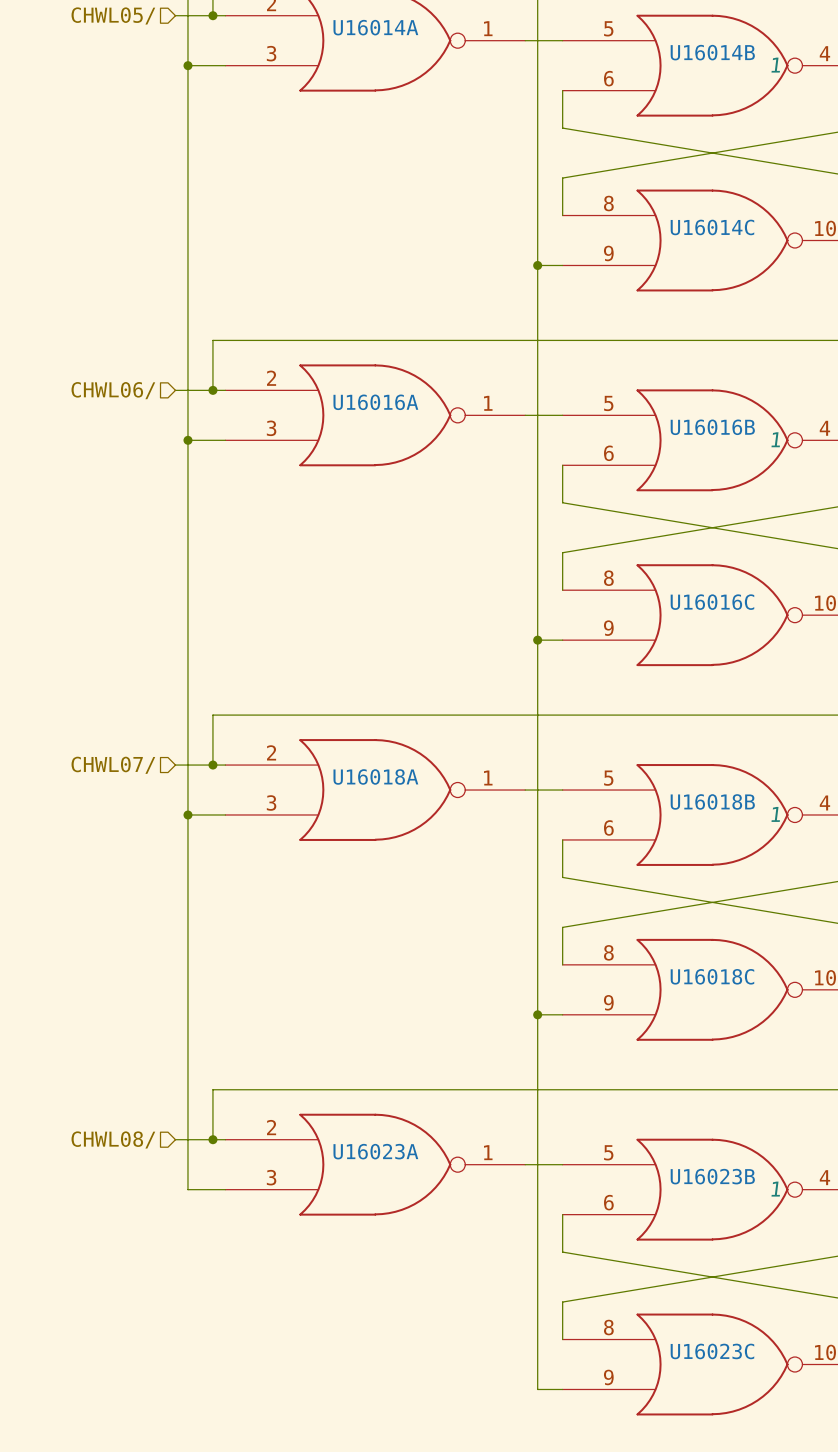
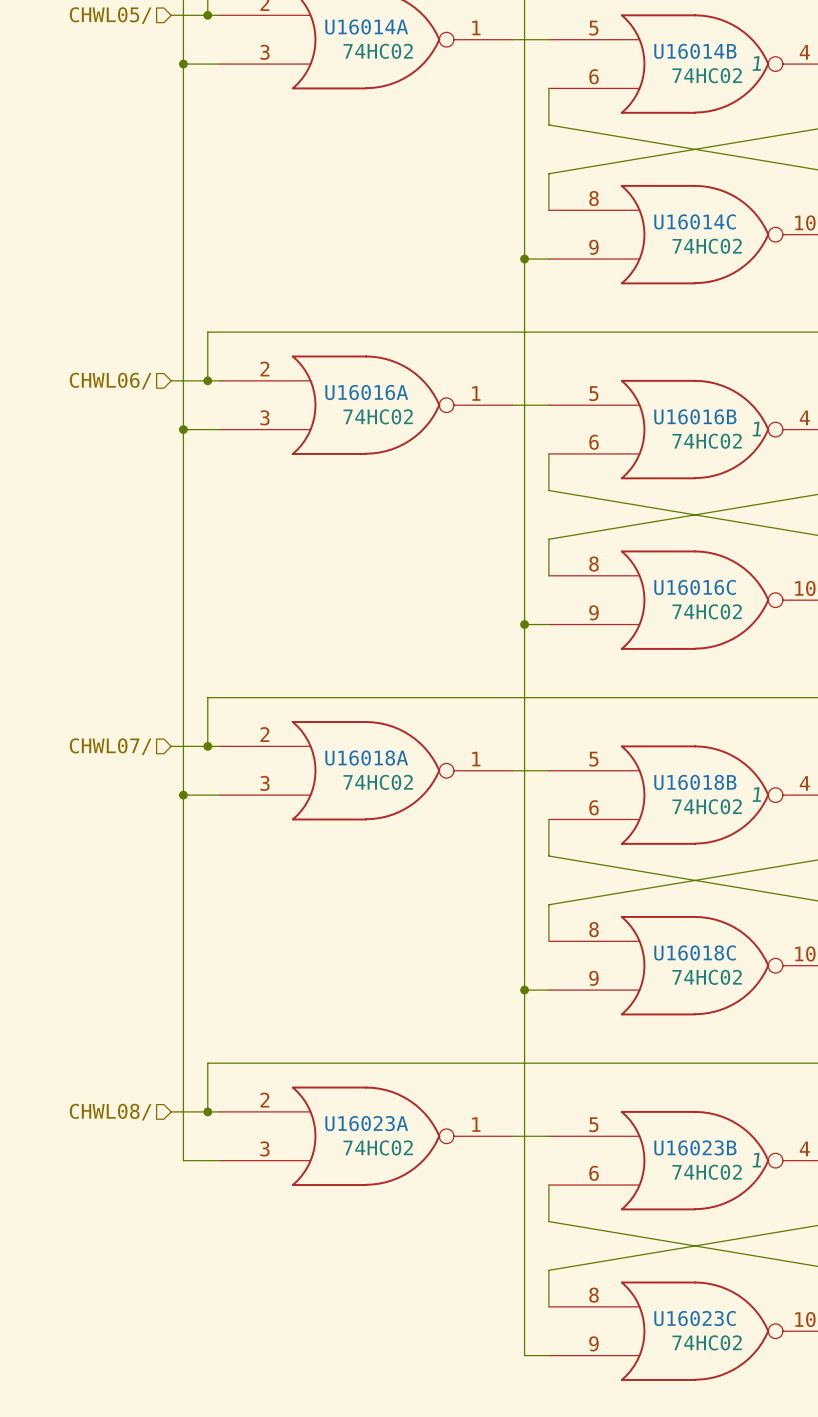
U16014A value: none -> 74HC02 (378, 51)
U16014B value: none -> 74HC02 (707, 75)
U16014C value: none -> 74HC02 (707, 246)
U16016A value: none -> 74HC02 (378, 416)
U16016B value: none -> 74HC02 (707, 441)
U16016C value: none -> 74HC02 (707, 611)
U16018A value: none -> 74HC02 (378, 782)
U16018B value: none -> 74HC02 (707, 806)
U16018C value: none -> 74HC02 (707, 977)
U16023A value: none -> 74HC02 (378, 1147)
U16023B value: none -> 74HC02 (707, 1172)
U16023C value: none -> 74HC02 (707, 1342)

